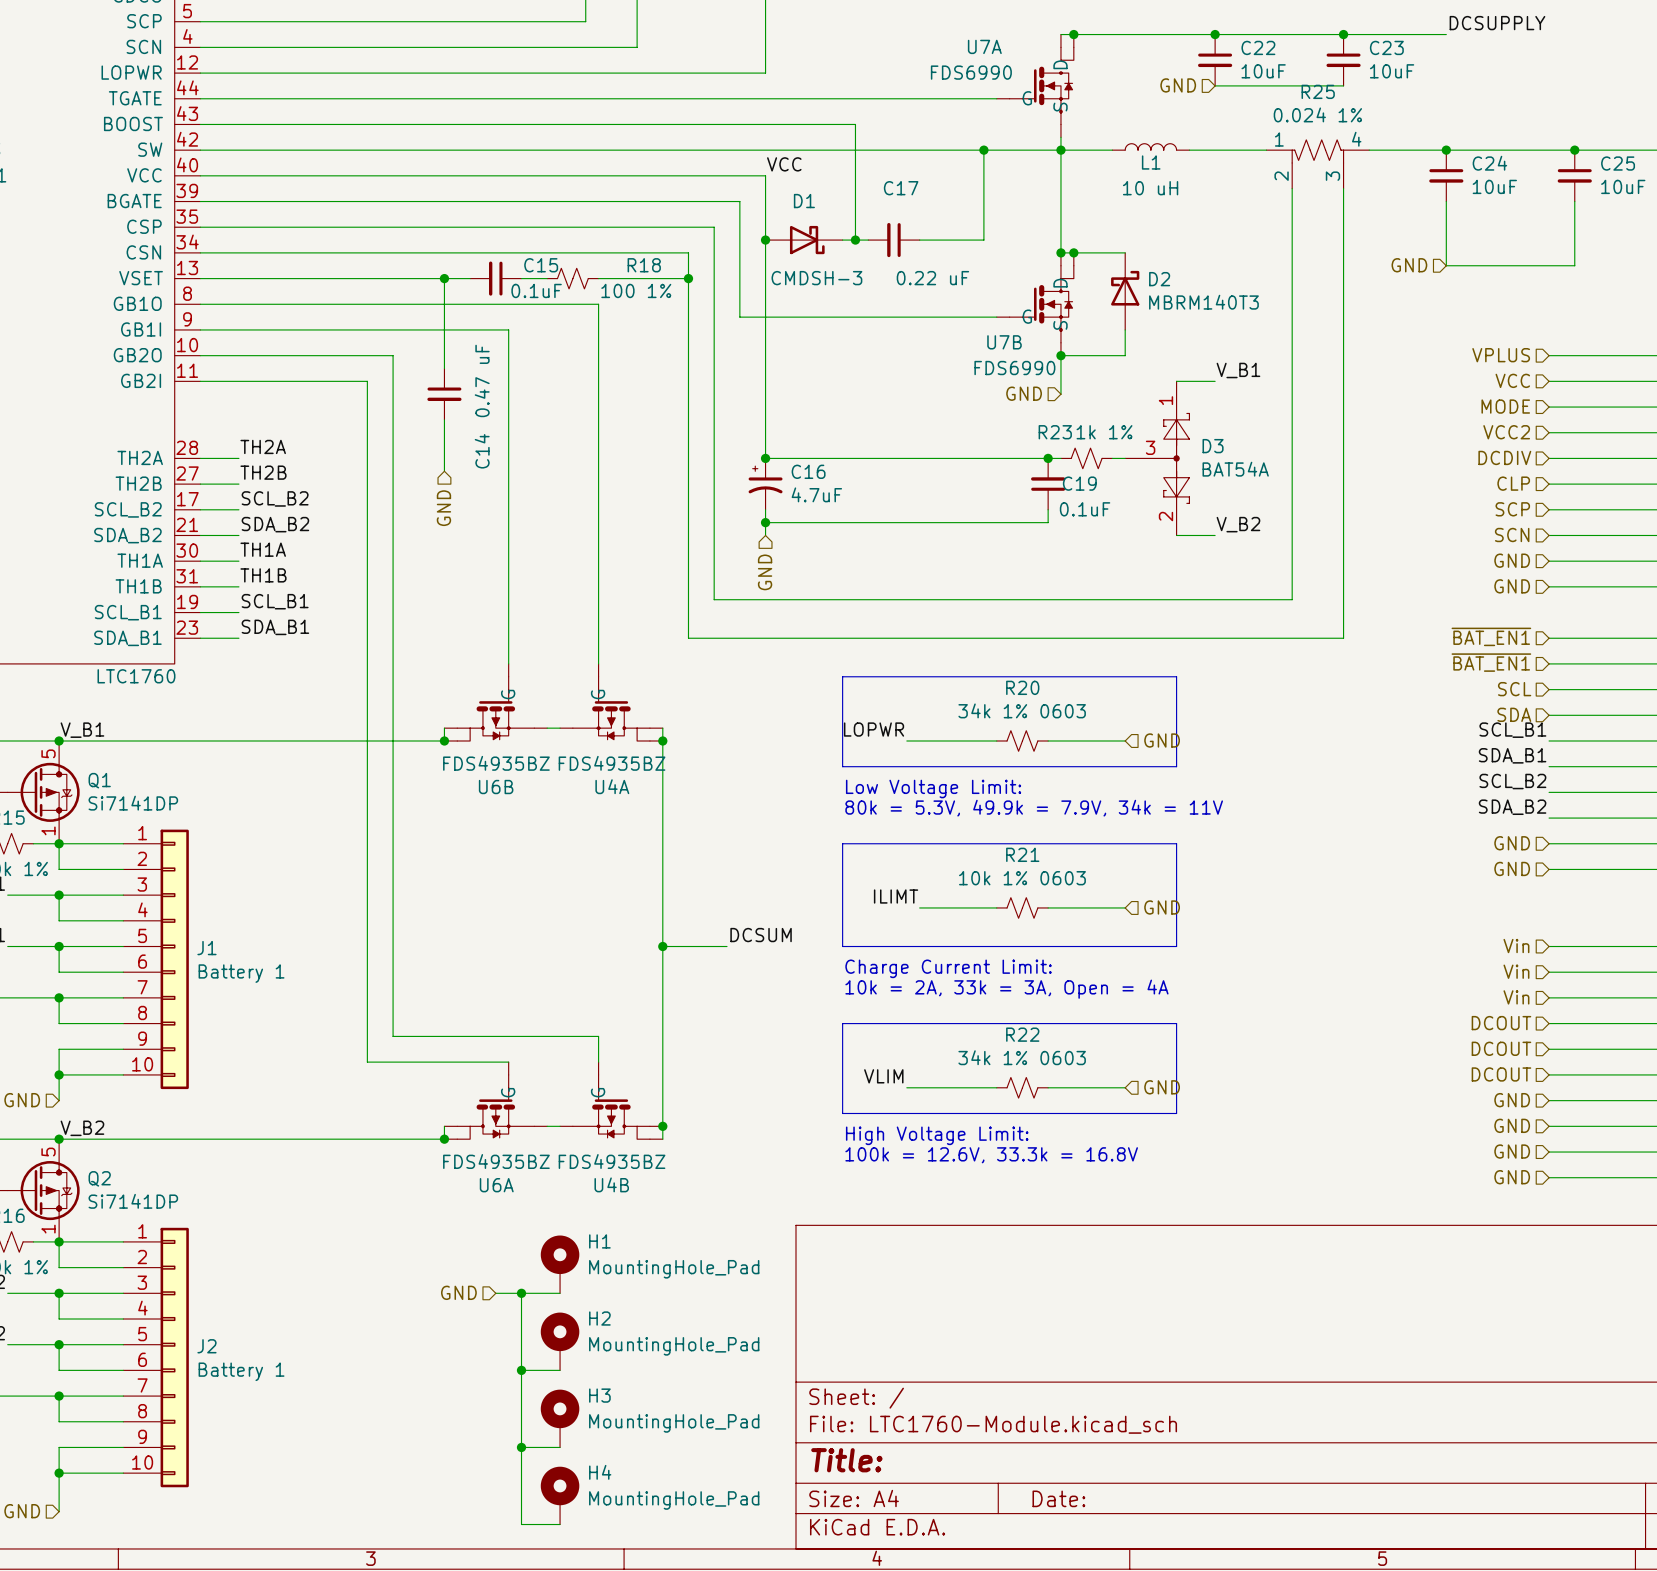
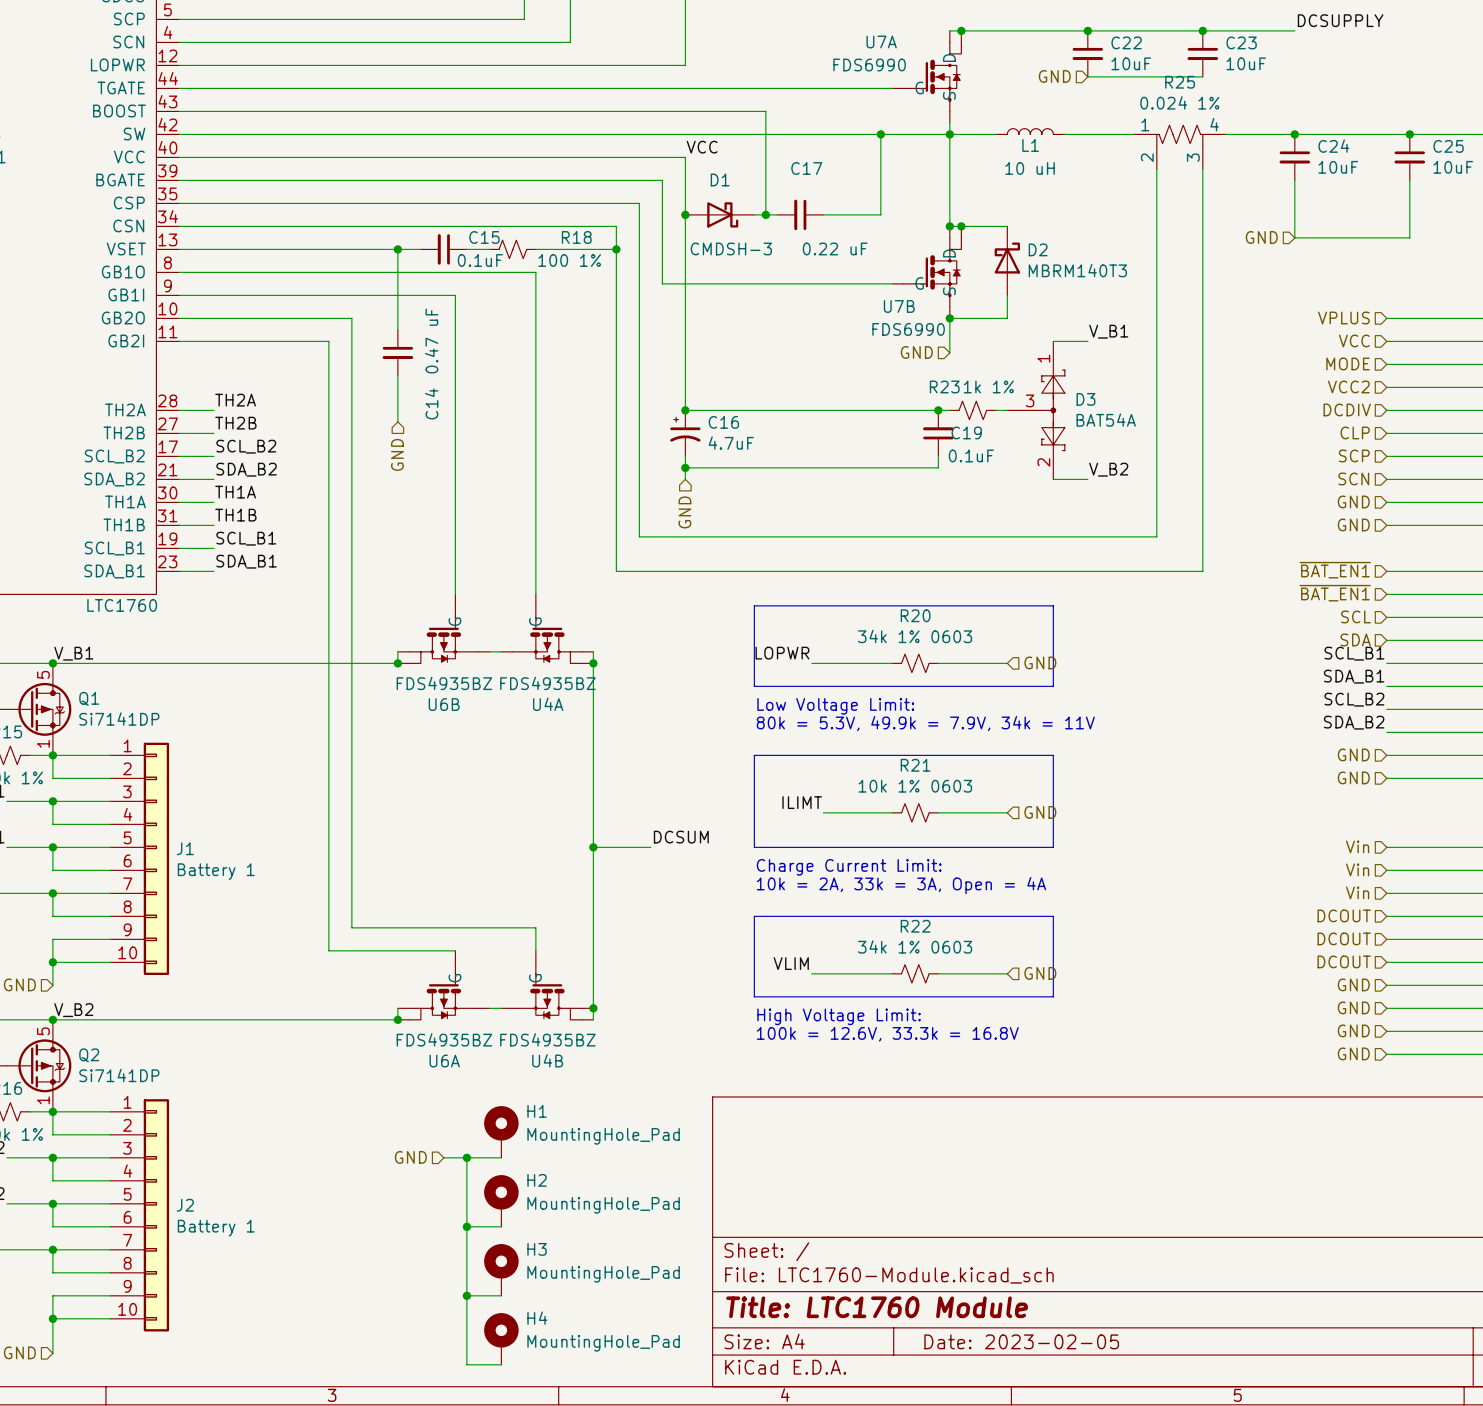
title block: Title: (846, 1460) -> Title: LTC1760 Module (877, 1307)
title block: Date: (1058, 1498) -> Date: 2023-02-05 (1021, 1341)

